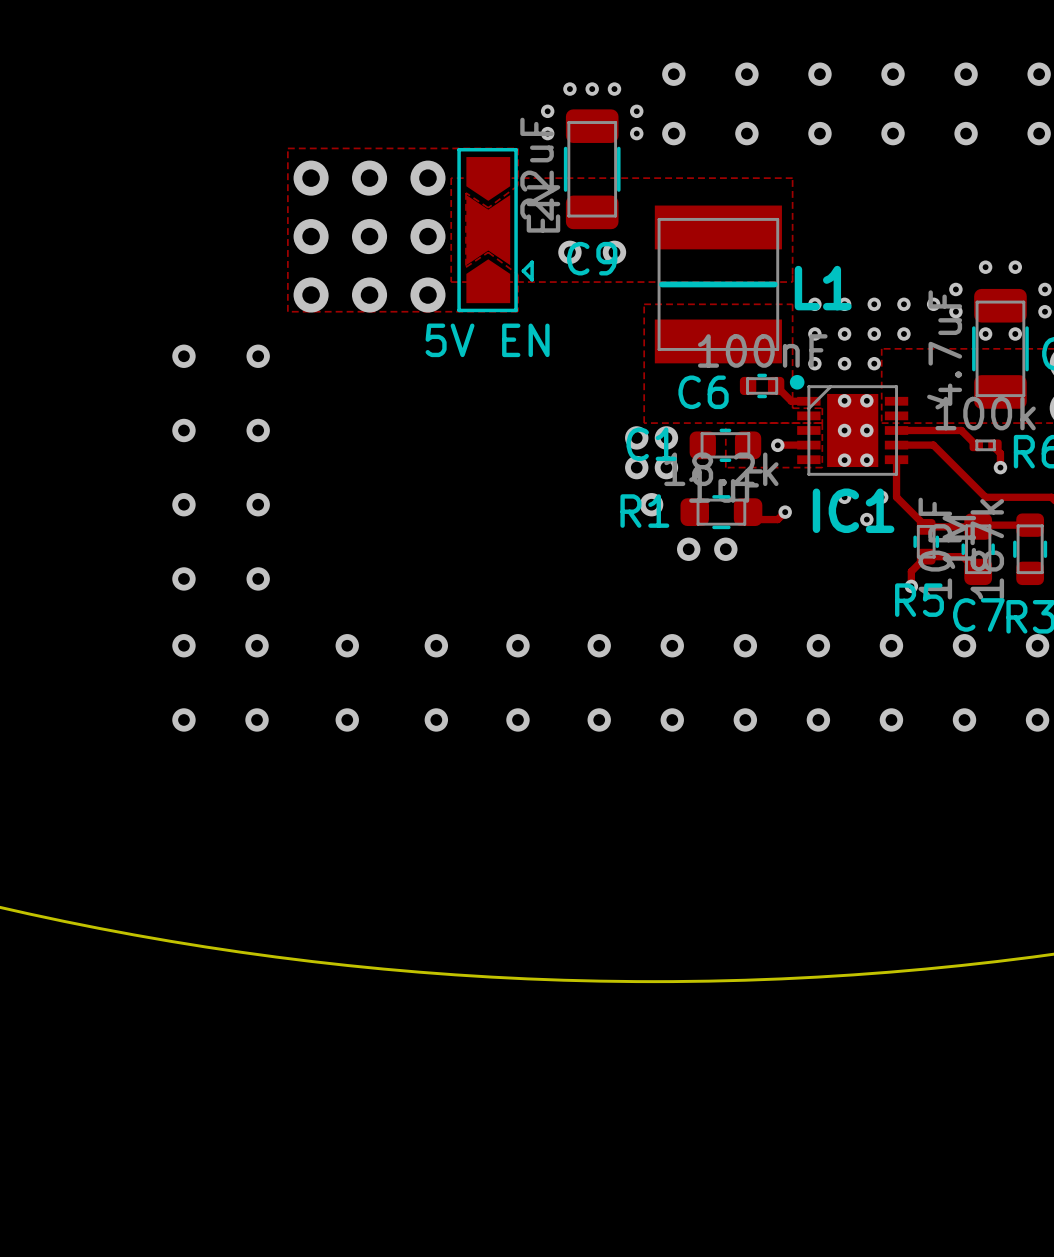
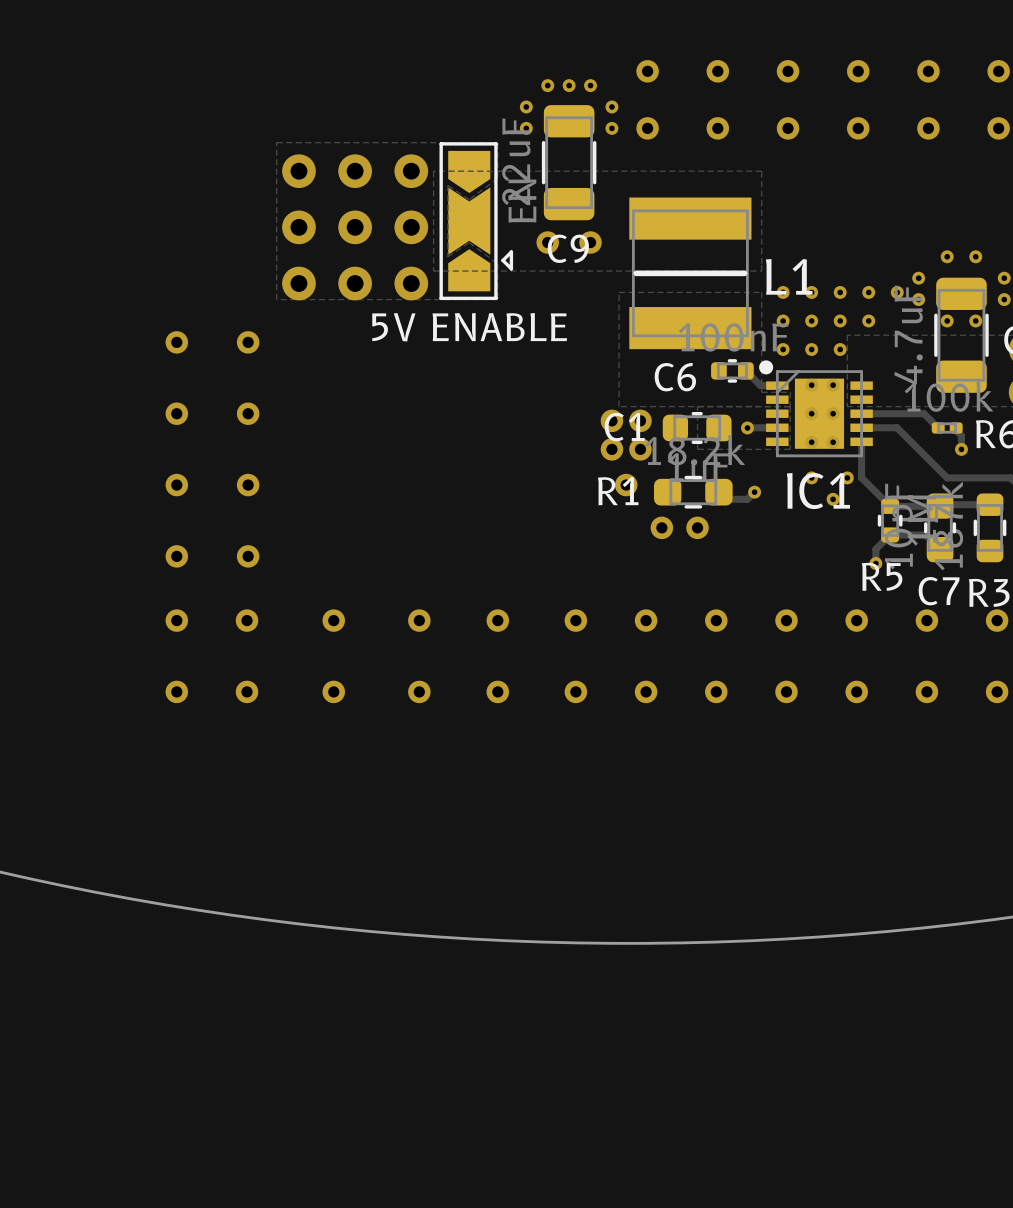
part text: 5V EN (487, 340) -> 5V ENABLE (469, 327)

